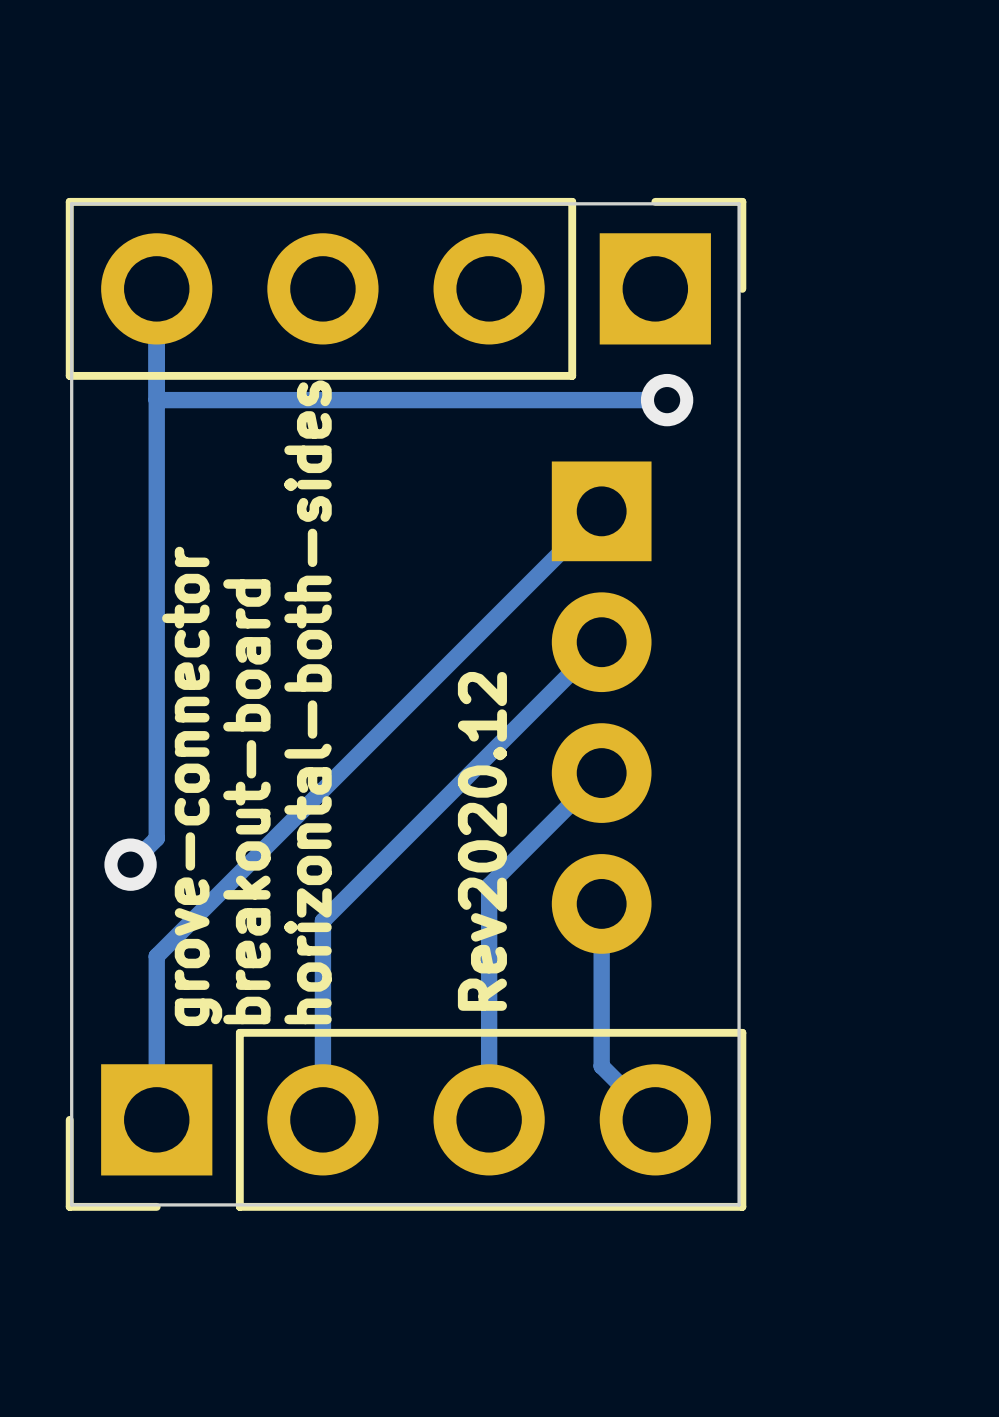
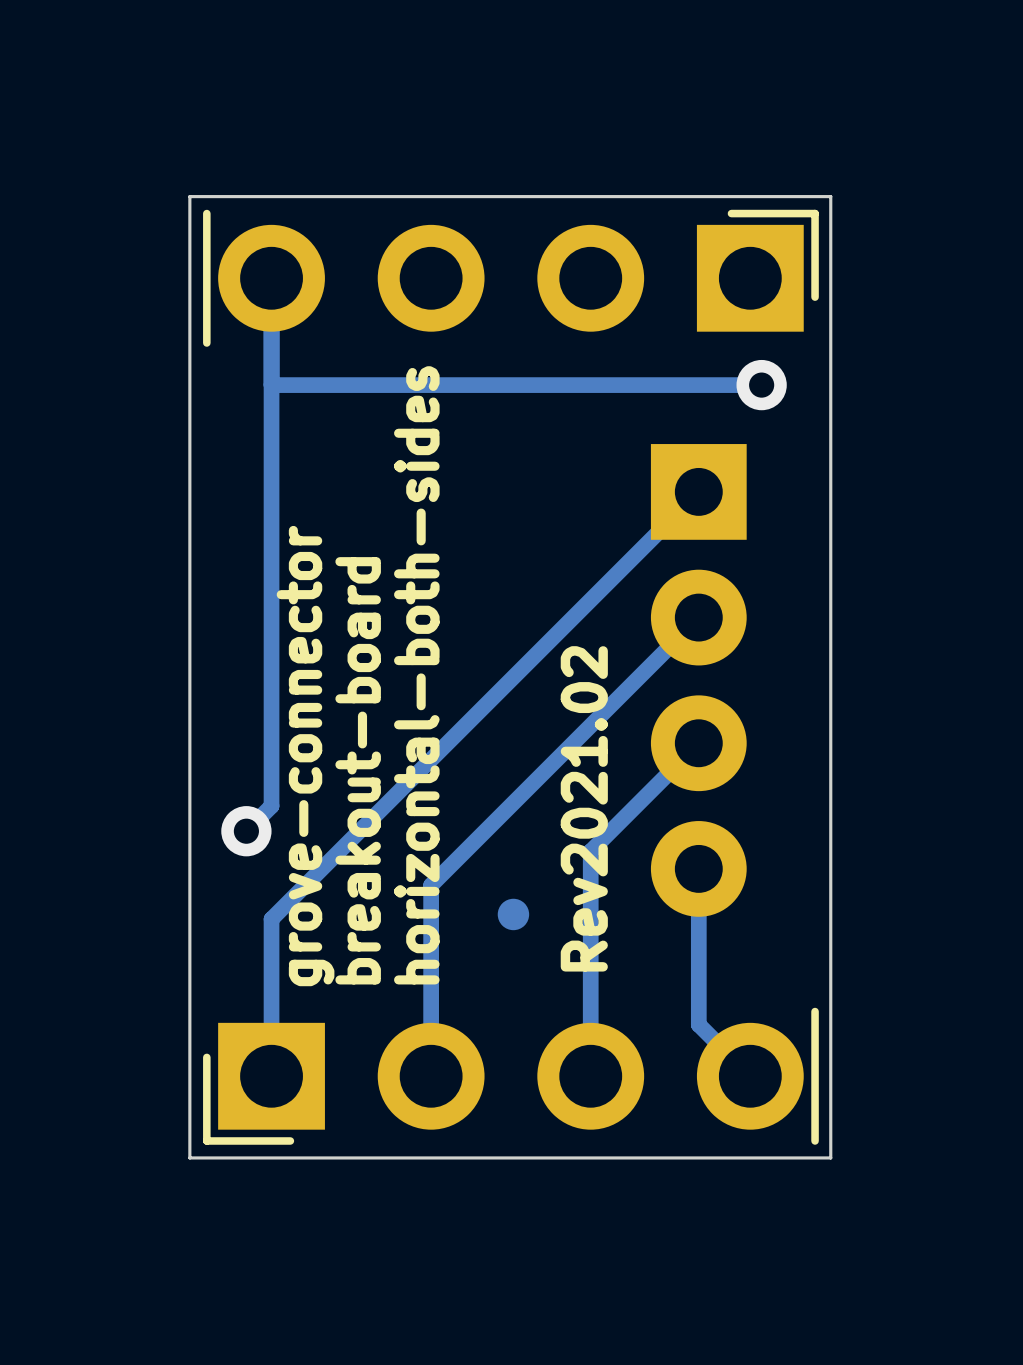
part footprint: [65, 197, 747, 380] -> [203, 209, 819, 347]
text: Rev2020.12 (482, 841) -> Rev2021.02 (584, 808)
part: none -> (513, 914)
part footprint: [65, 1028, 747, 1211] -> [203, 1007, 819, 1145]

